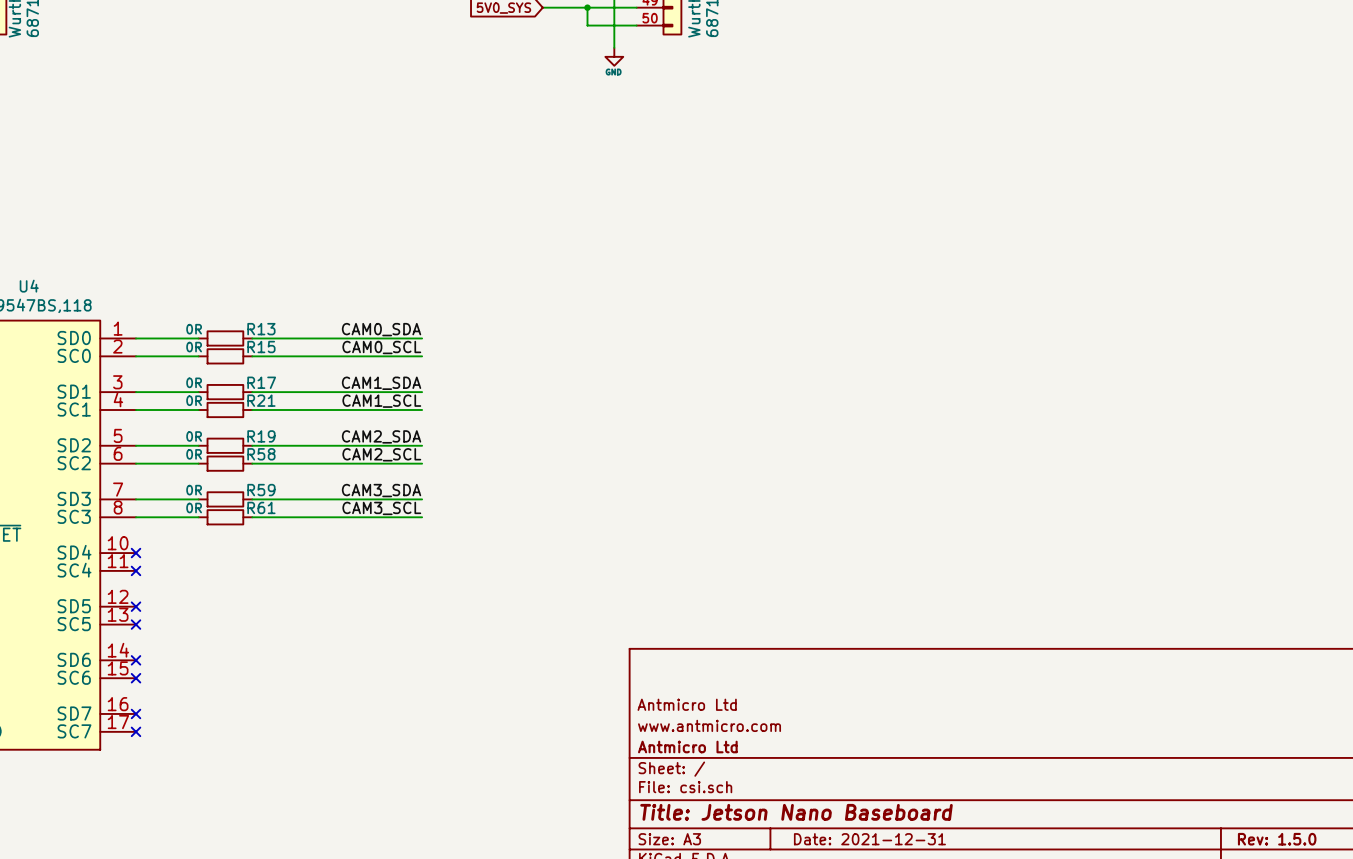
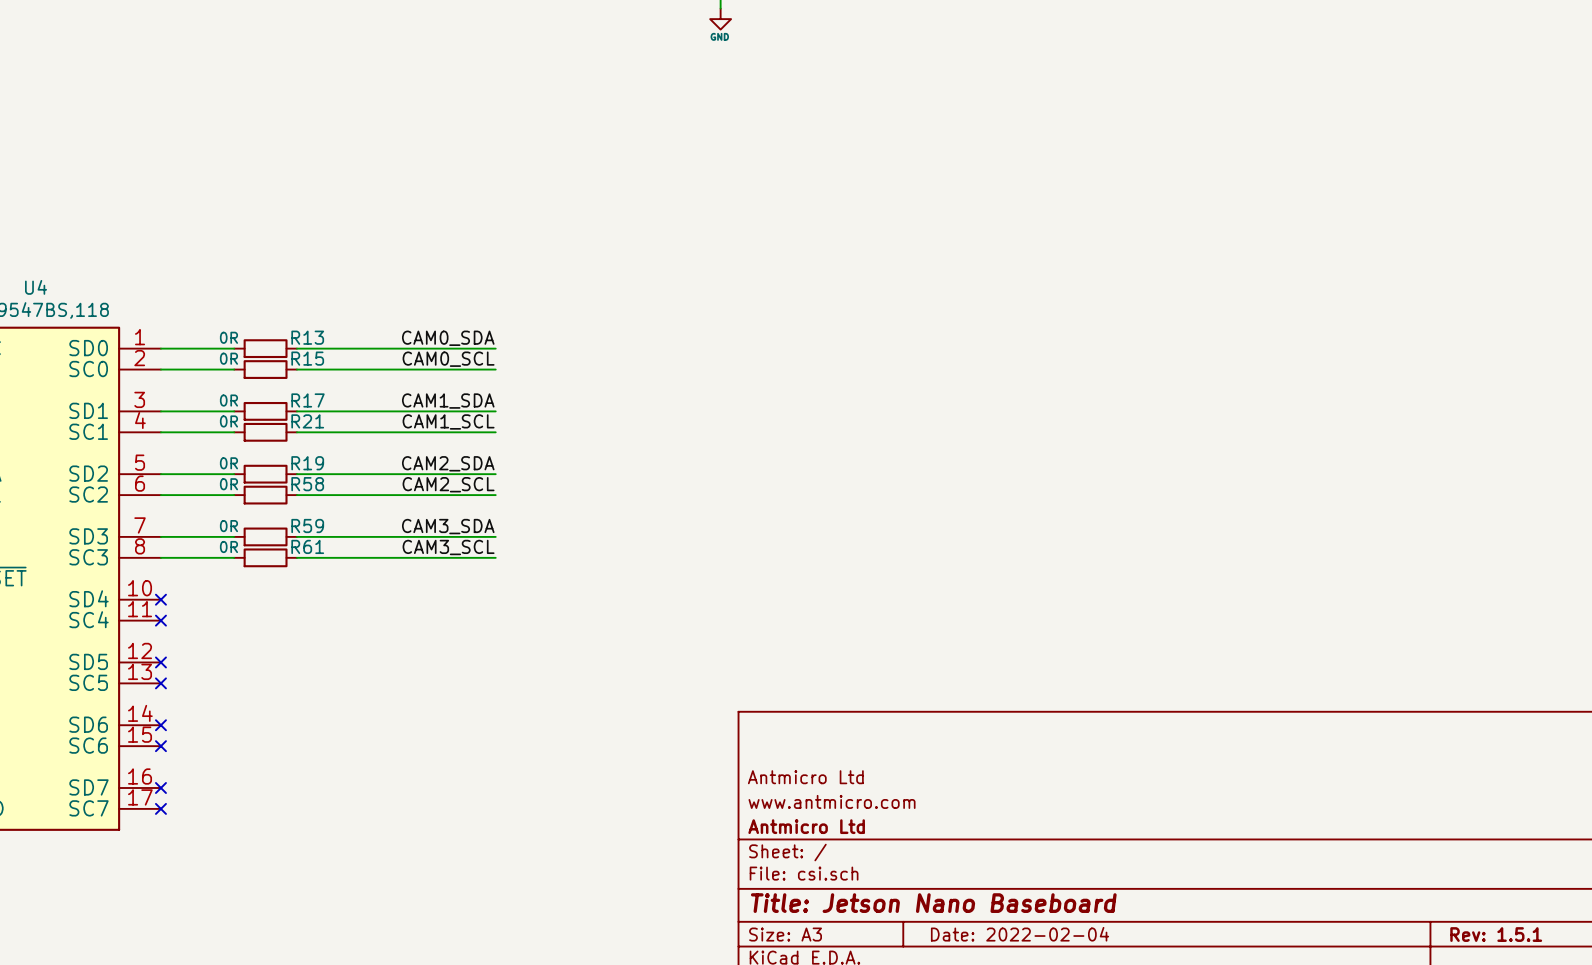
title block: Date: 2021-12-31 (869, 839) -> Date: 2022-02-04 (1020, 934)
title block: Rev: 1.5.0 (1277, 839) -> Rev: 1.5.1 (1496, 934)

